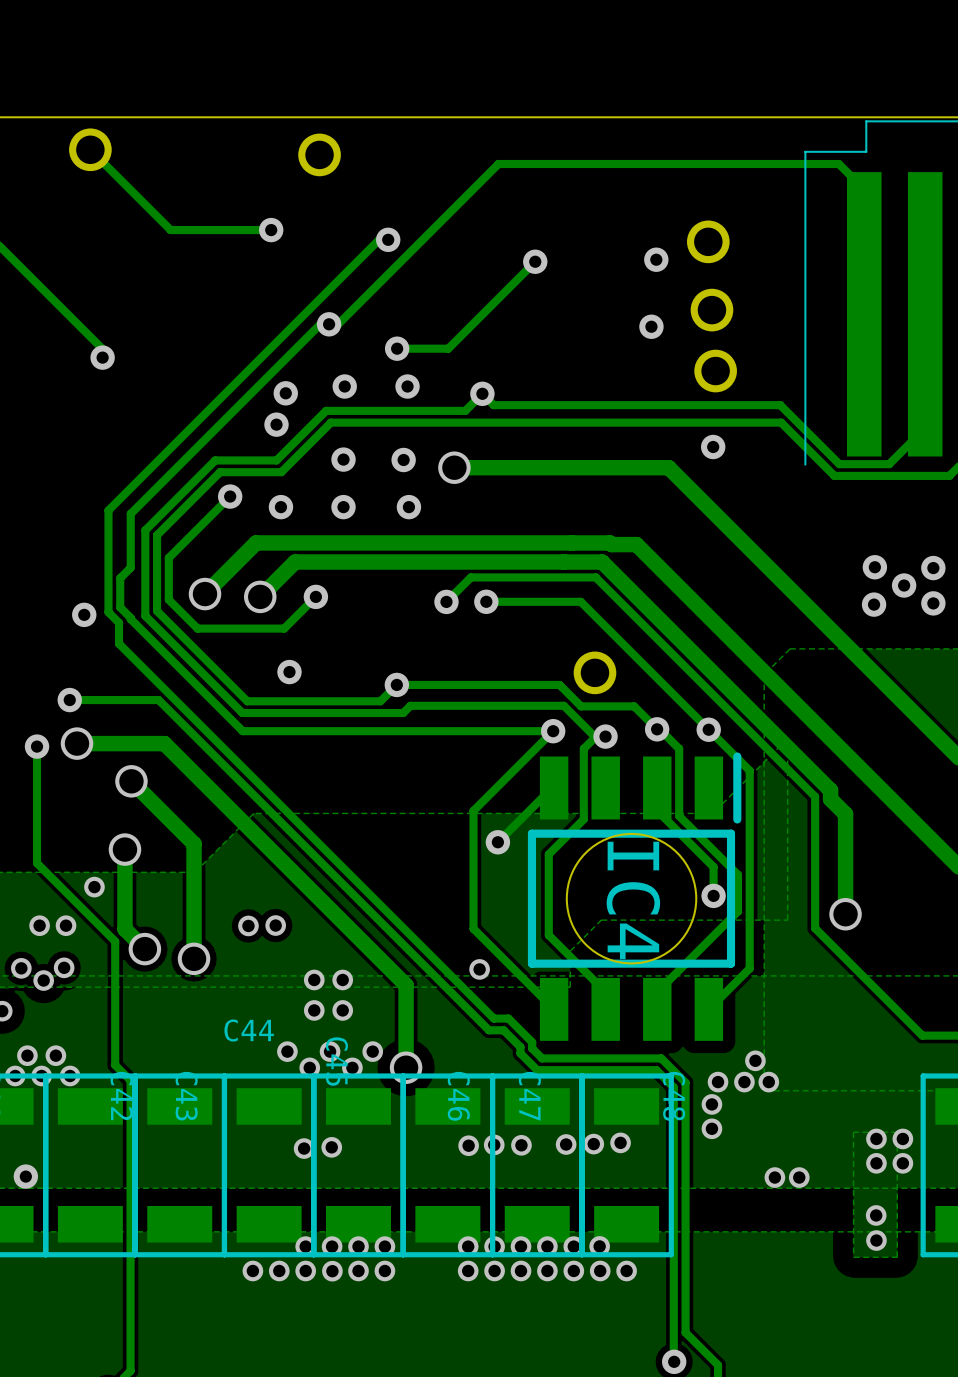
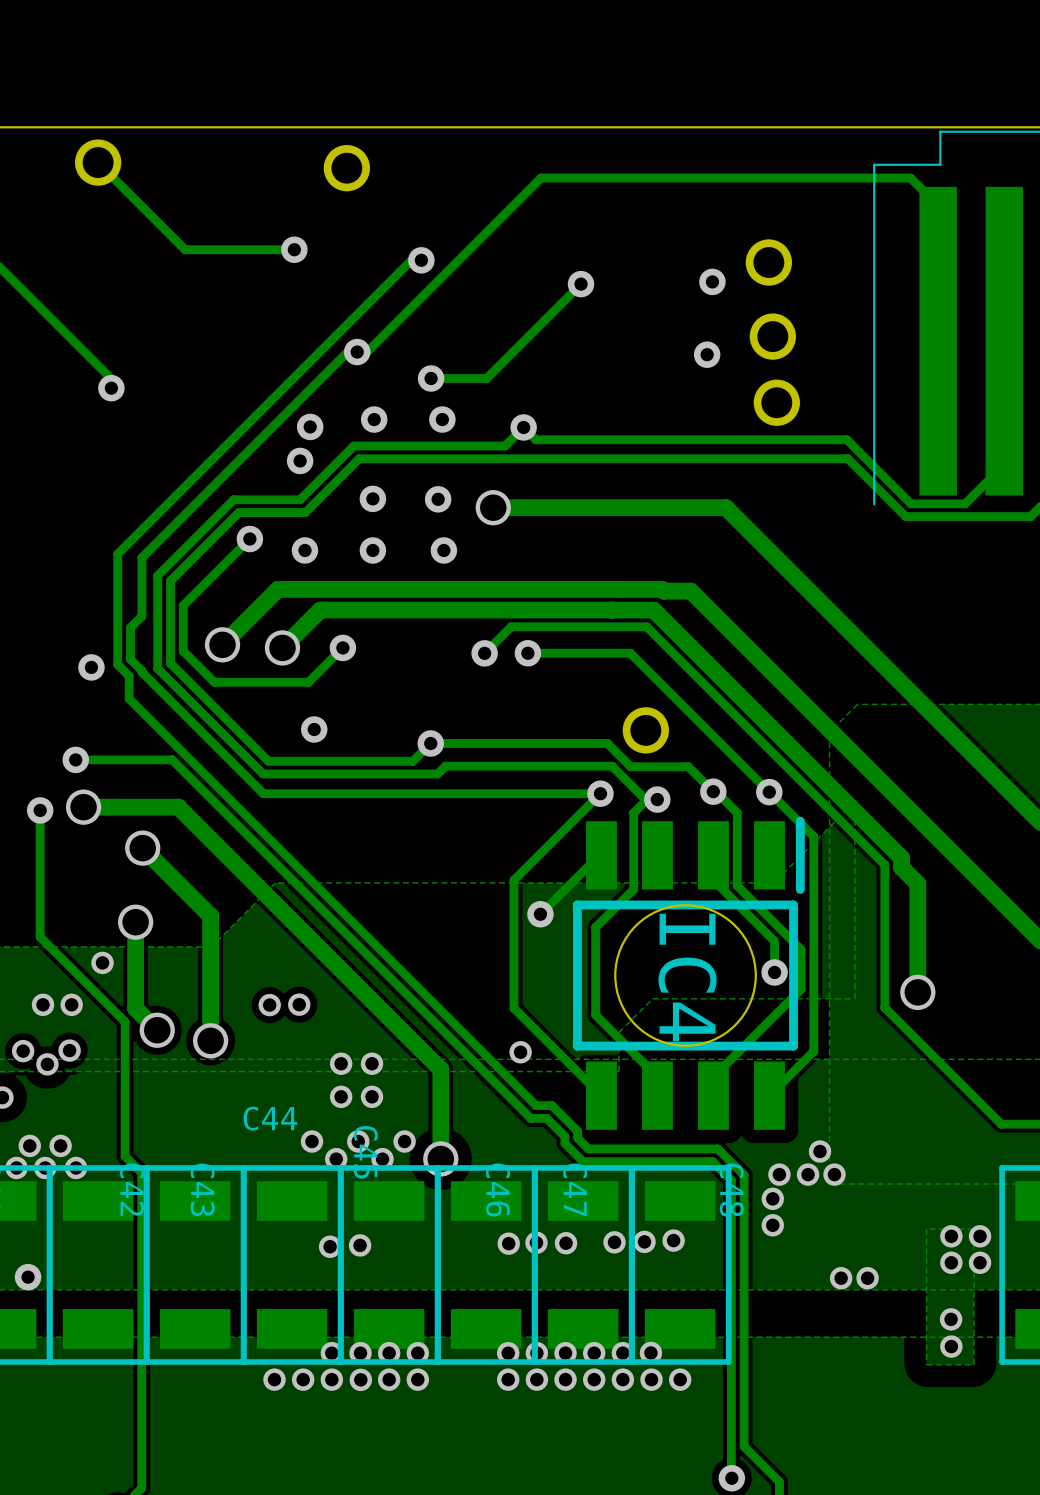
via: (713, 447) -> none
via: (874, 567) -> none
via: (933, 568) -> none
via: (904, 585) -> none
via: (933, 603) -> none
via: (874, 604) -> none

